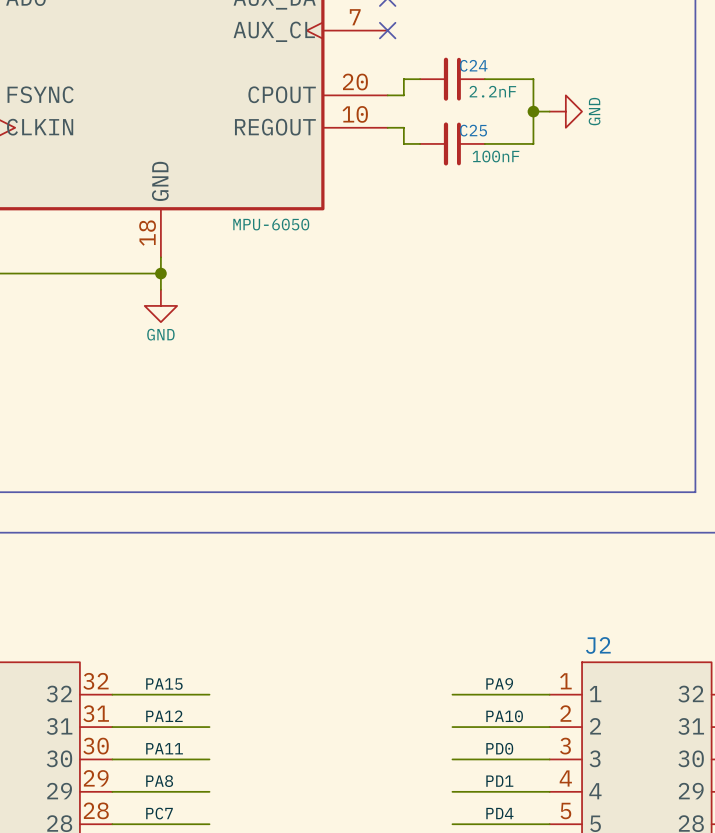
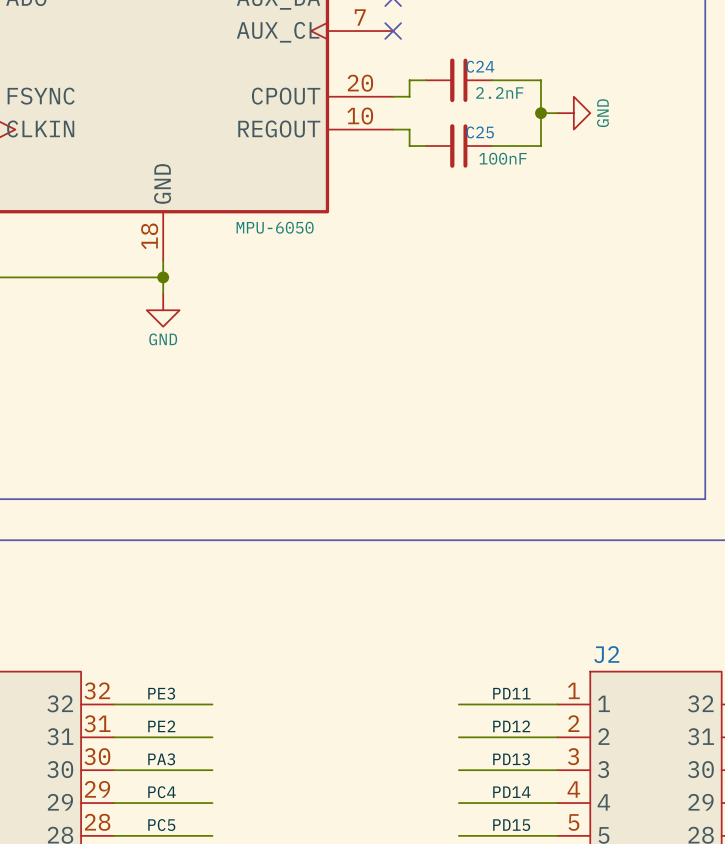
label: PA9 (499, 683) -> PD11 (511, 693)
label: PA15 (164, 684) -> PE3 (161, 693)
label: PA12 (164, 716) -> PE2 (161, 726)
label: PA10 (504, 716) -> PD12 (511, 726)
label: PA11 (164, 748) -> PA3 (161, 759)
label: PD0 (499, 748) -> PD13 (511, 759)
label: PA8 (159, 781) -> PC4 (162, 792)
label: PD1 (499, 781) -> PD14 (511, 792)
label: PC7 (159, 813) -> PC5 (161, 825)
label: PD4 (499, 813) -> PD15 (511, 825)

